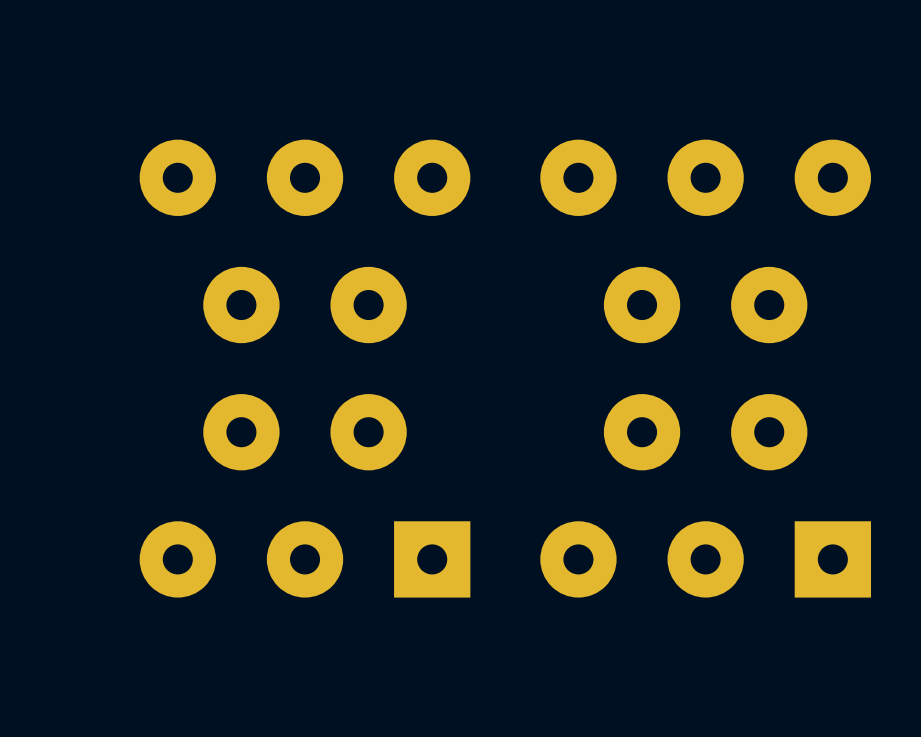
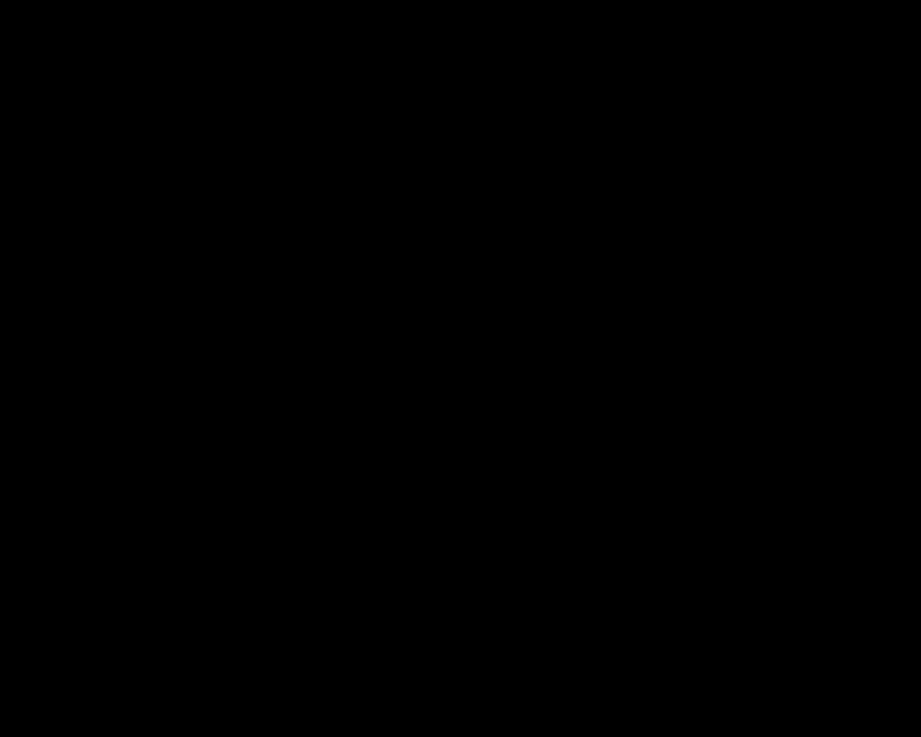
part: (305, 368) -> none
part: (705, 368) -> none

